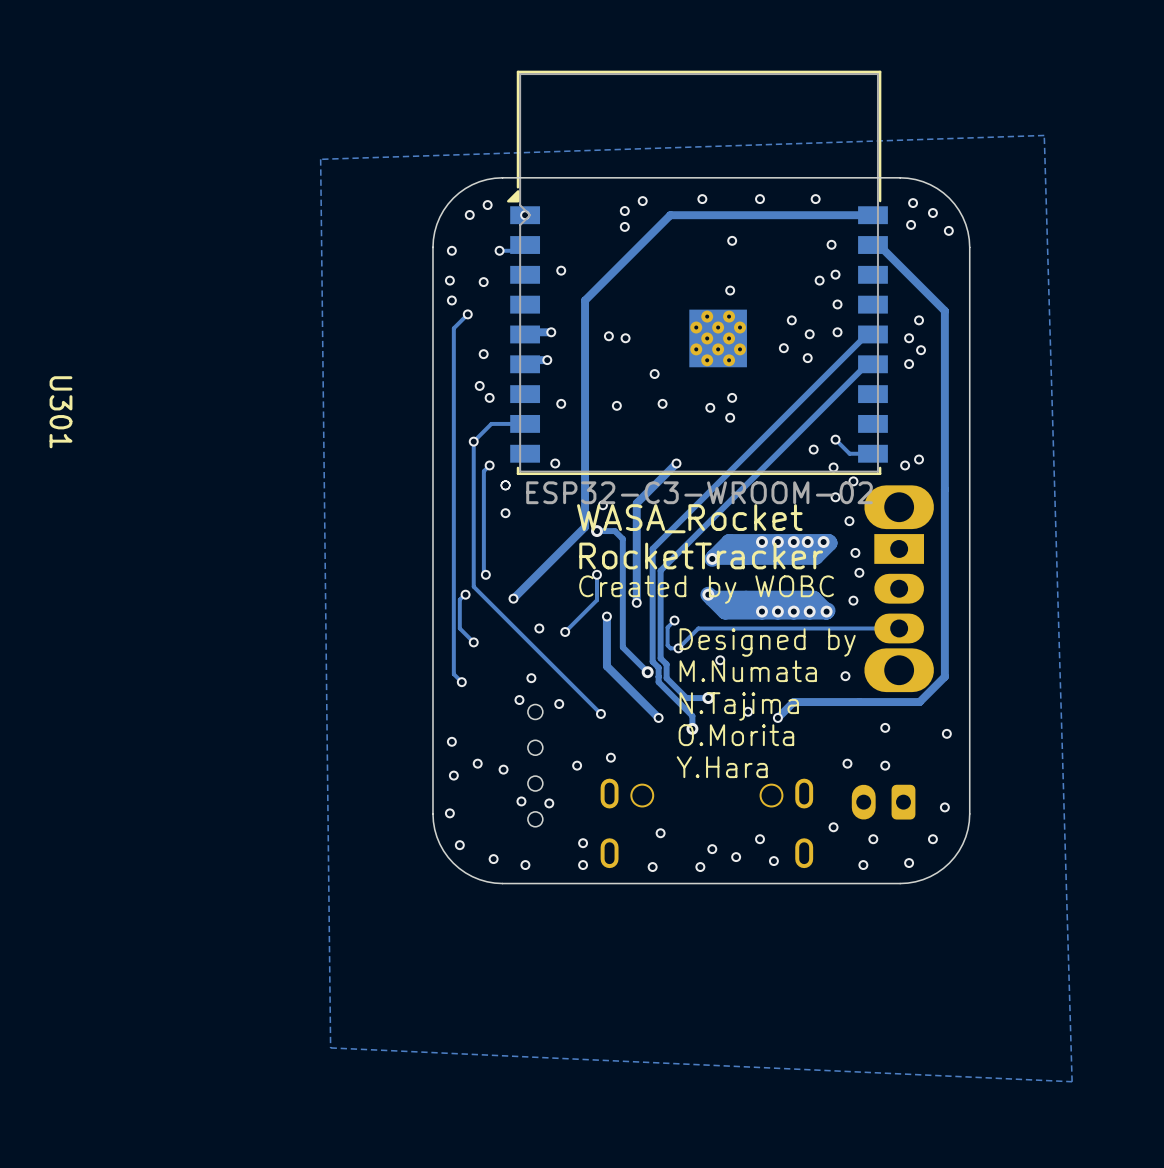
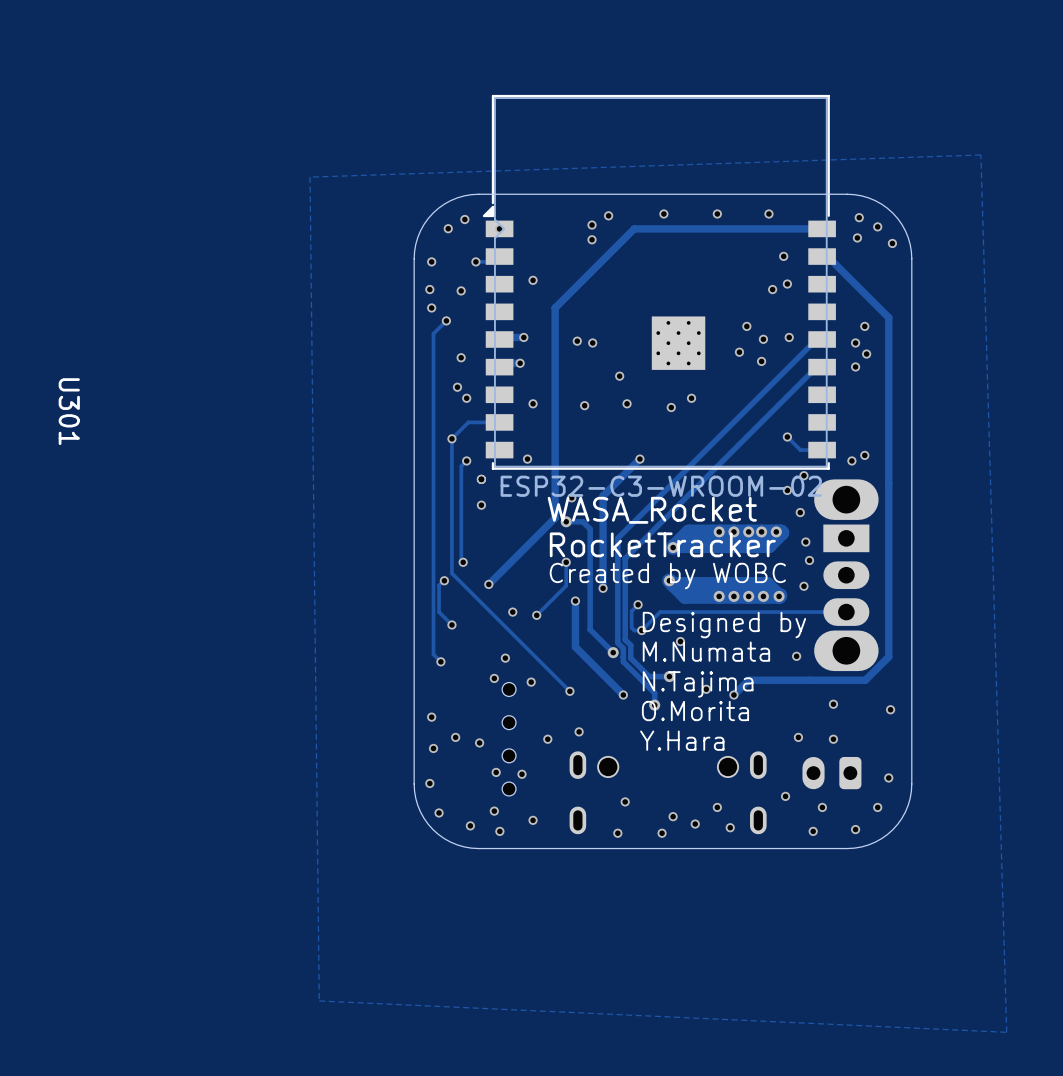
via: (732, 240) -> none
via: (730, 290) -> none
via: (837, 304) -> none
via: (730, 417) -> none
via: (813, 449) -> none
via: (833, 467) -> none
via: none -> (494, 811)
via: (583, 843) -> none
via: none -> (533, 820)
via: (583, 865) -> none

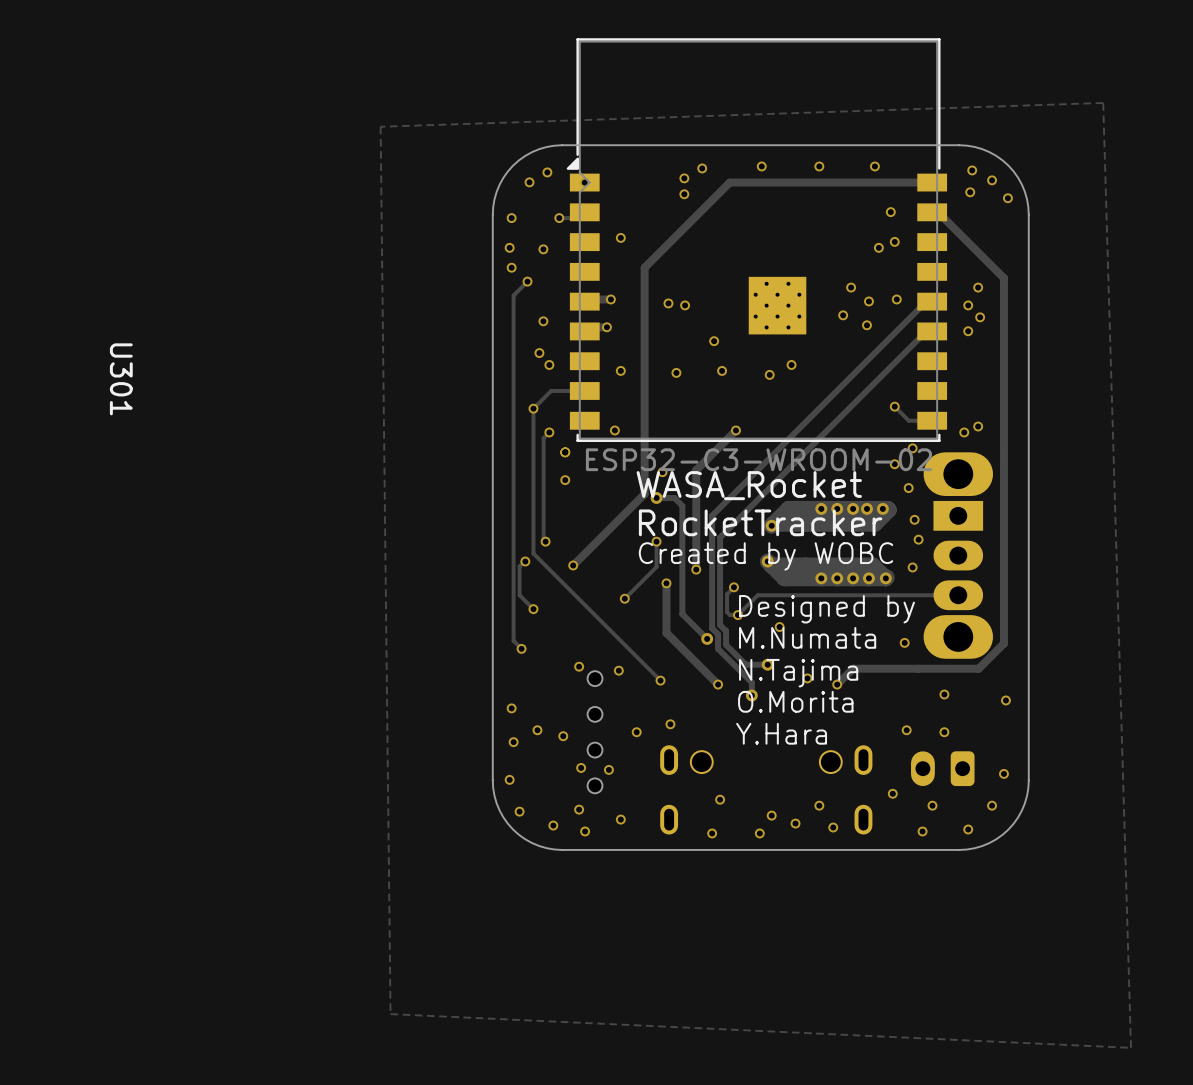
via: (512, 612) -> none
via: (505, 658) -> none

